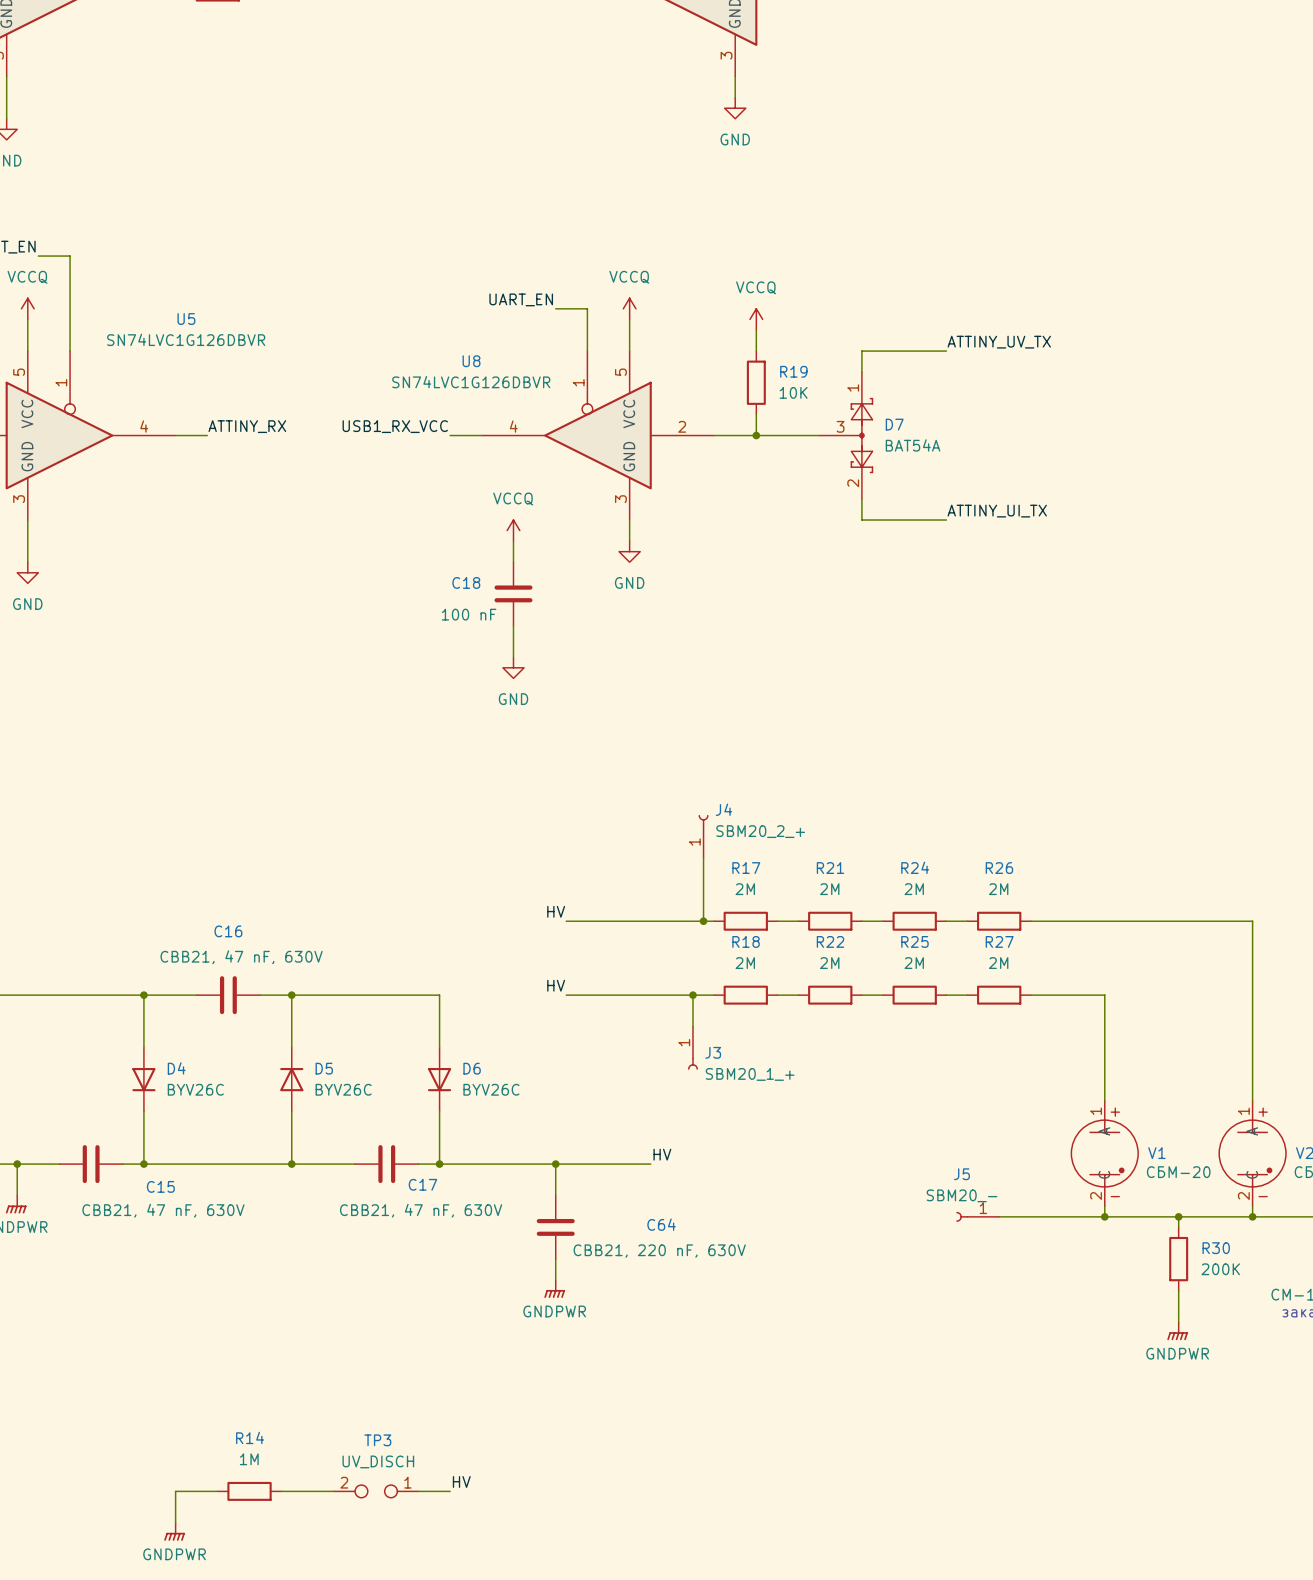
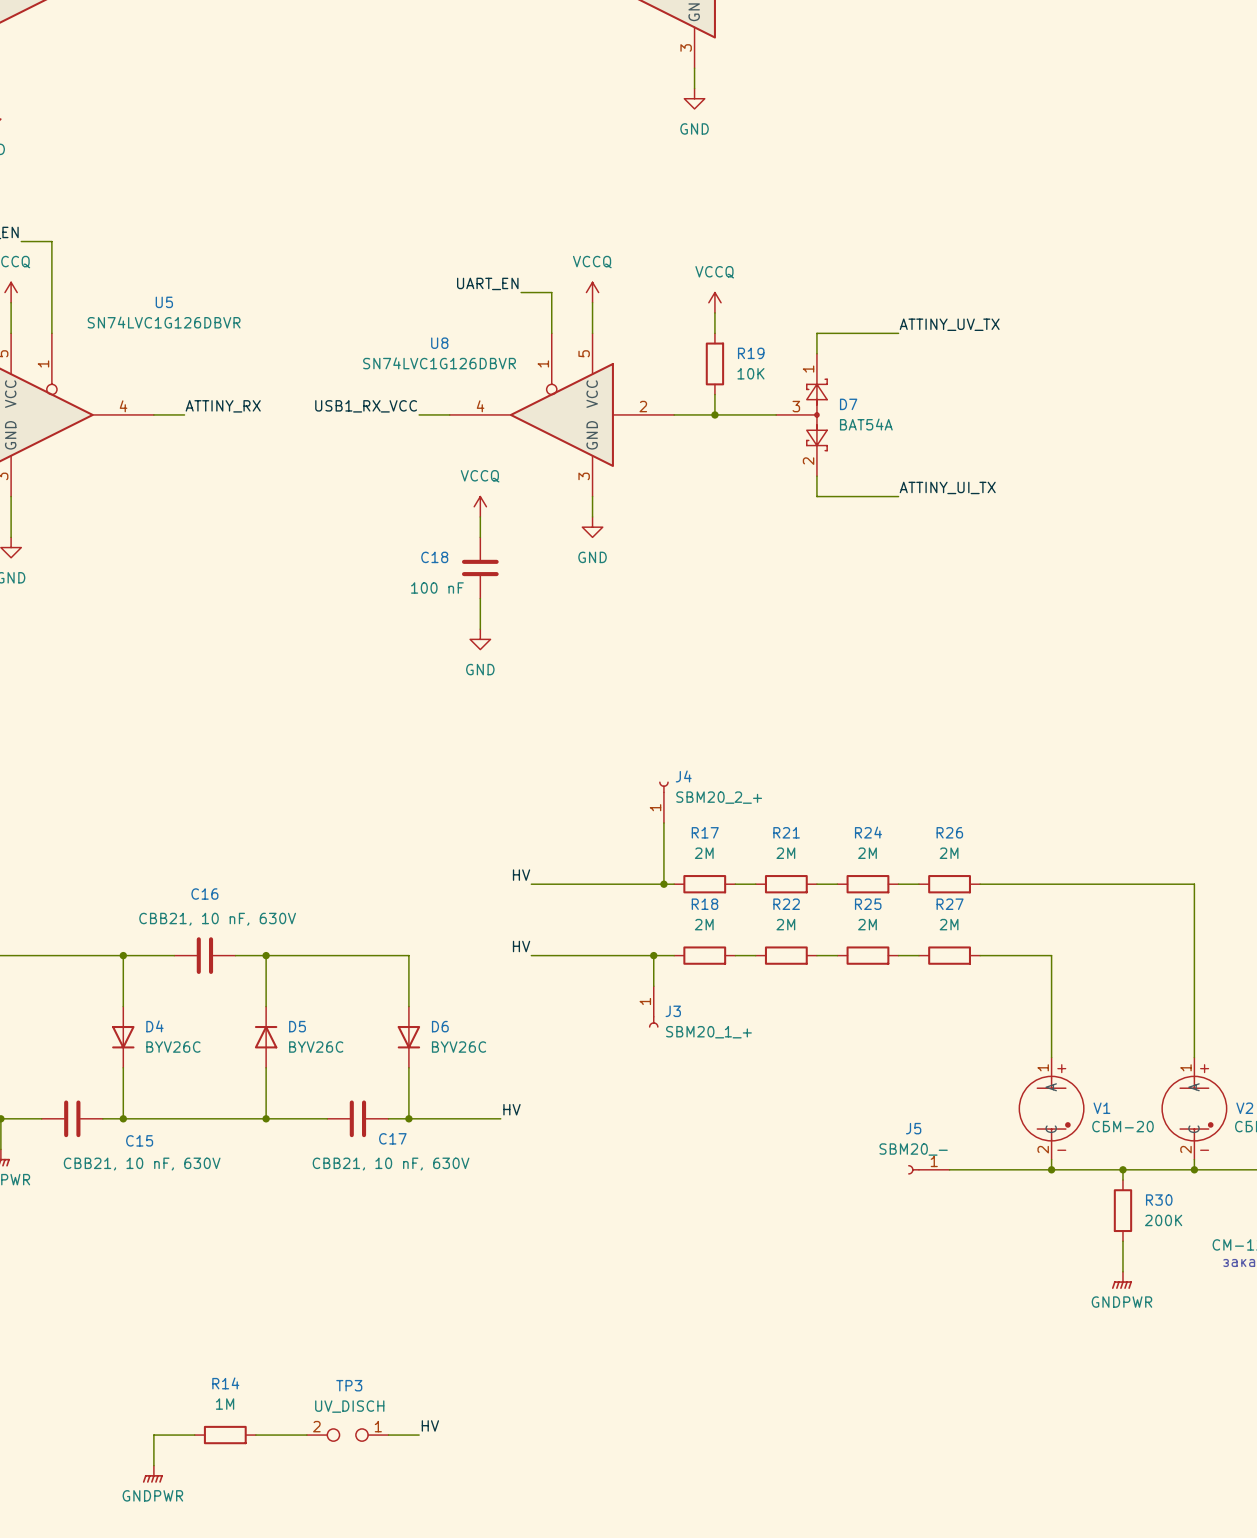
C16 value: CBB21, 47 nF, 630V (241, 957) -> CBB21, 10 nF, 630V (217, 919)
label position: HV (662, 1154) -> HV (511, 1109)
wire: (534, 1164) (650, 1164) -> none
wire: (555, 1164) (555, 1195) -> none
junction: (555, 1164) -> none
C15 value: CBB21, 47 nF, 630V (163, 1210) -> CBB21, 10 nF, 630V (142, 1164)
C17 value: CBB21, 47 nF, 630V (421, 1210) -> CBB21, 10 nF, 630V (391, 1164)
C64: CBB21, 220 nF, 630V (555, 1227) -> none
wire: (555, 1259) (555, 1280) -> none
power symbol: GNDPWR (554, 1289) -> none

